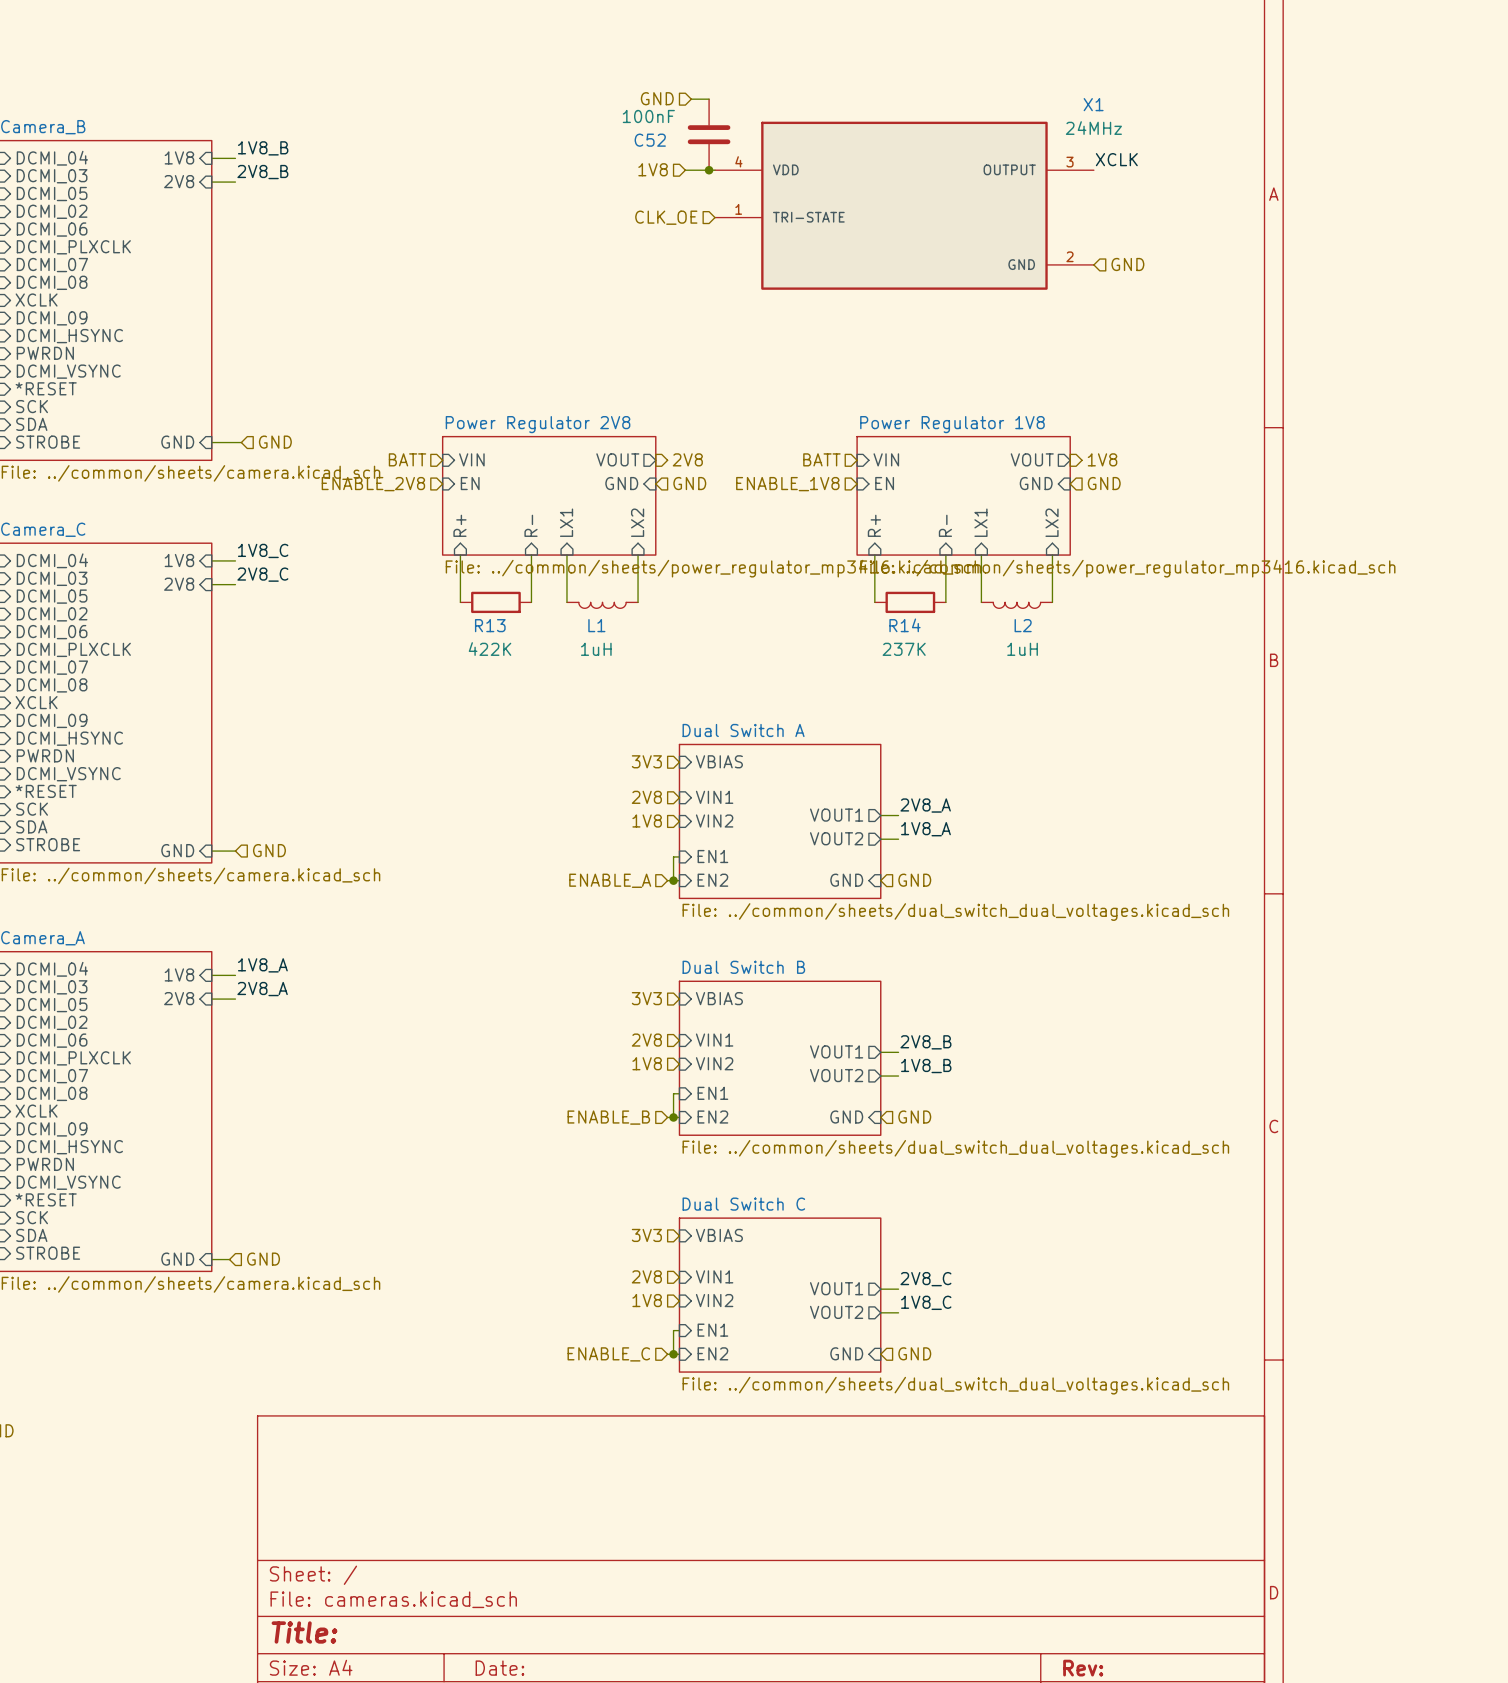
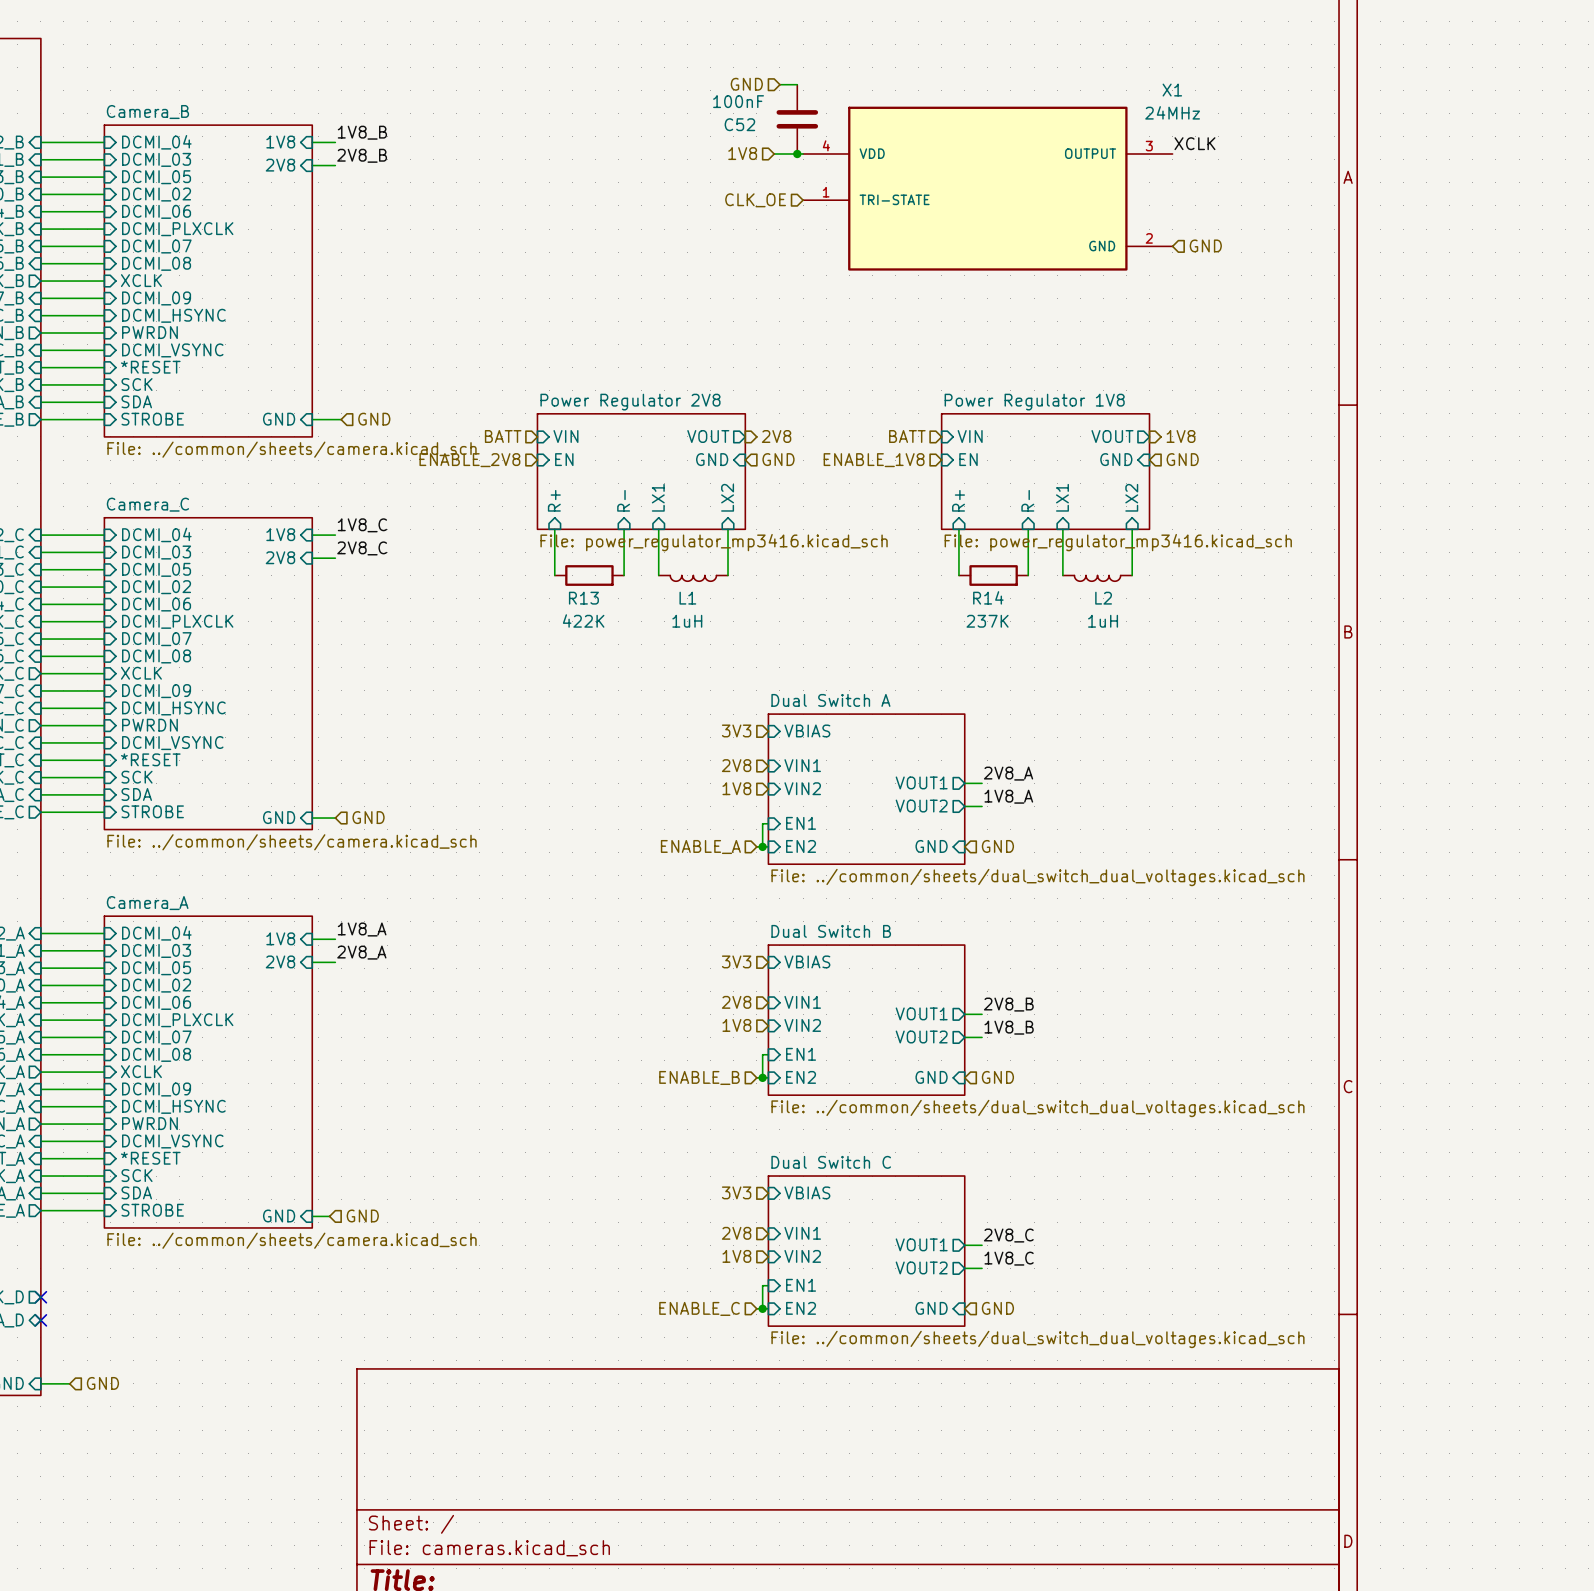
sheet Power Regulator 2V8 value: File: ../common/sheets/power_regulator_mp3416.kicad_sch (713, 568) -> File: power_regulator_mp3416.kicad_sch (714, 542)
sheet Power Regulator 1V8 value: File: ../common/sheets/power_regulator_mp3416.kicad_sch (1127, 568) -> File: power_regulator_mp3416.kicad_sch (1118, 542)

